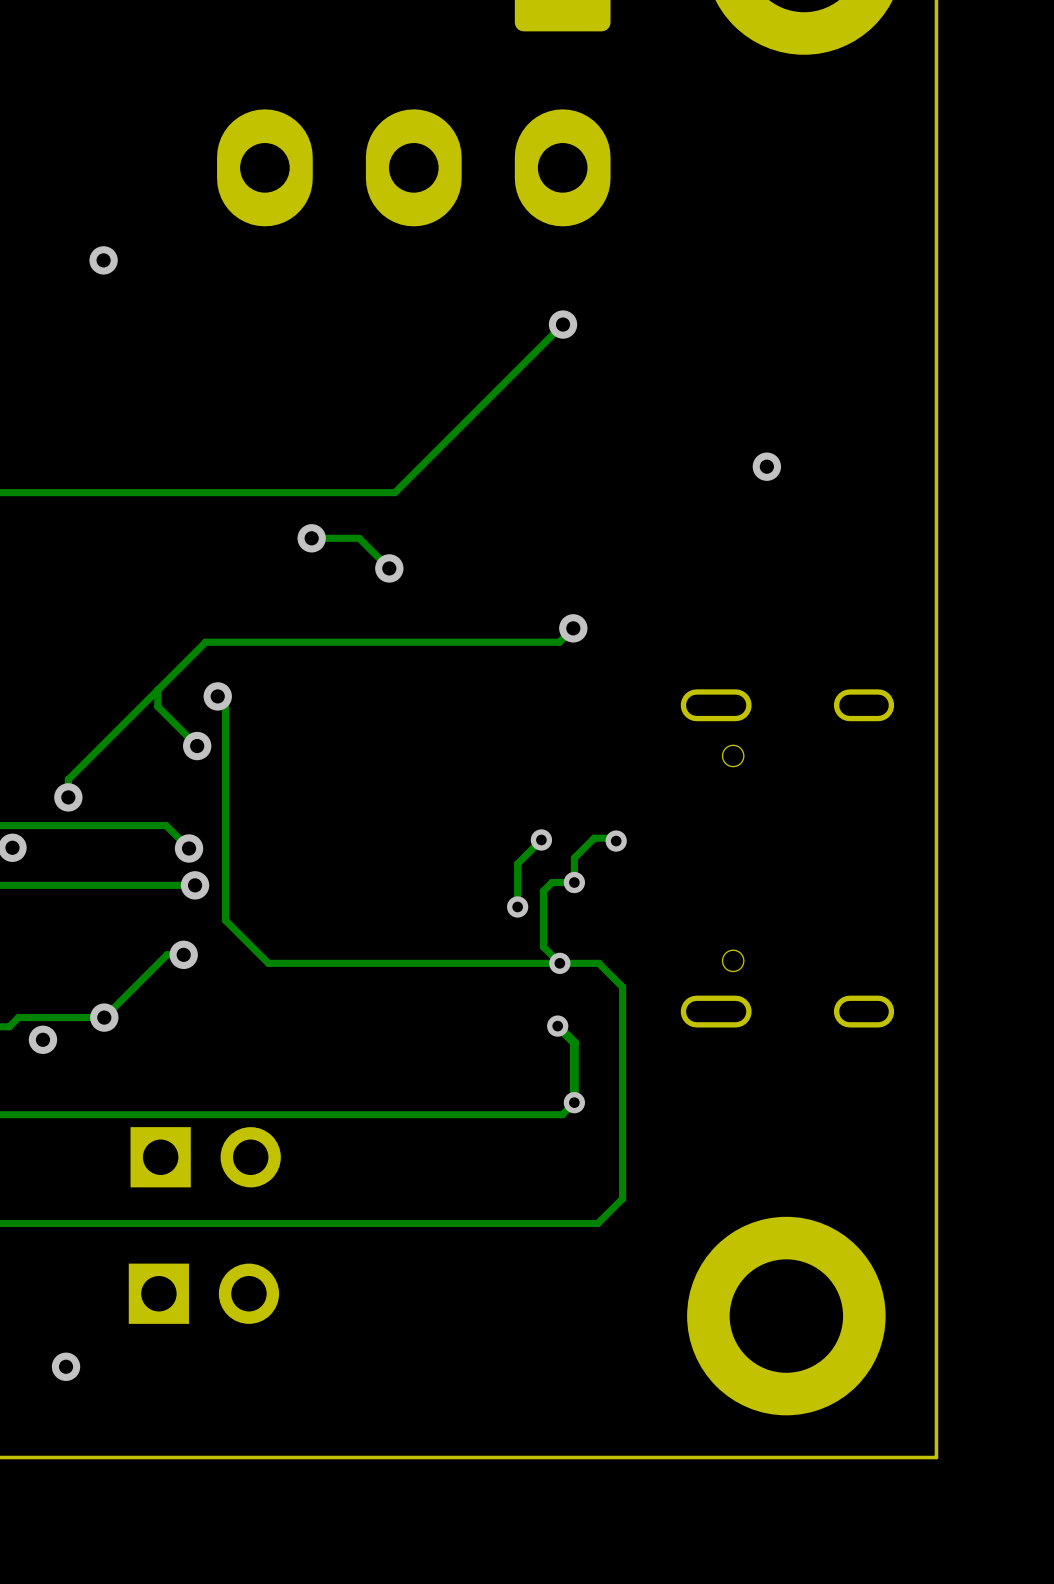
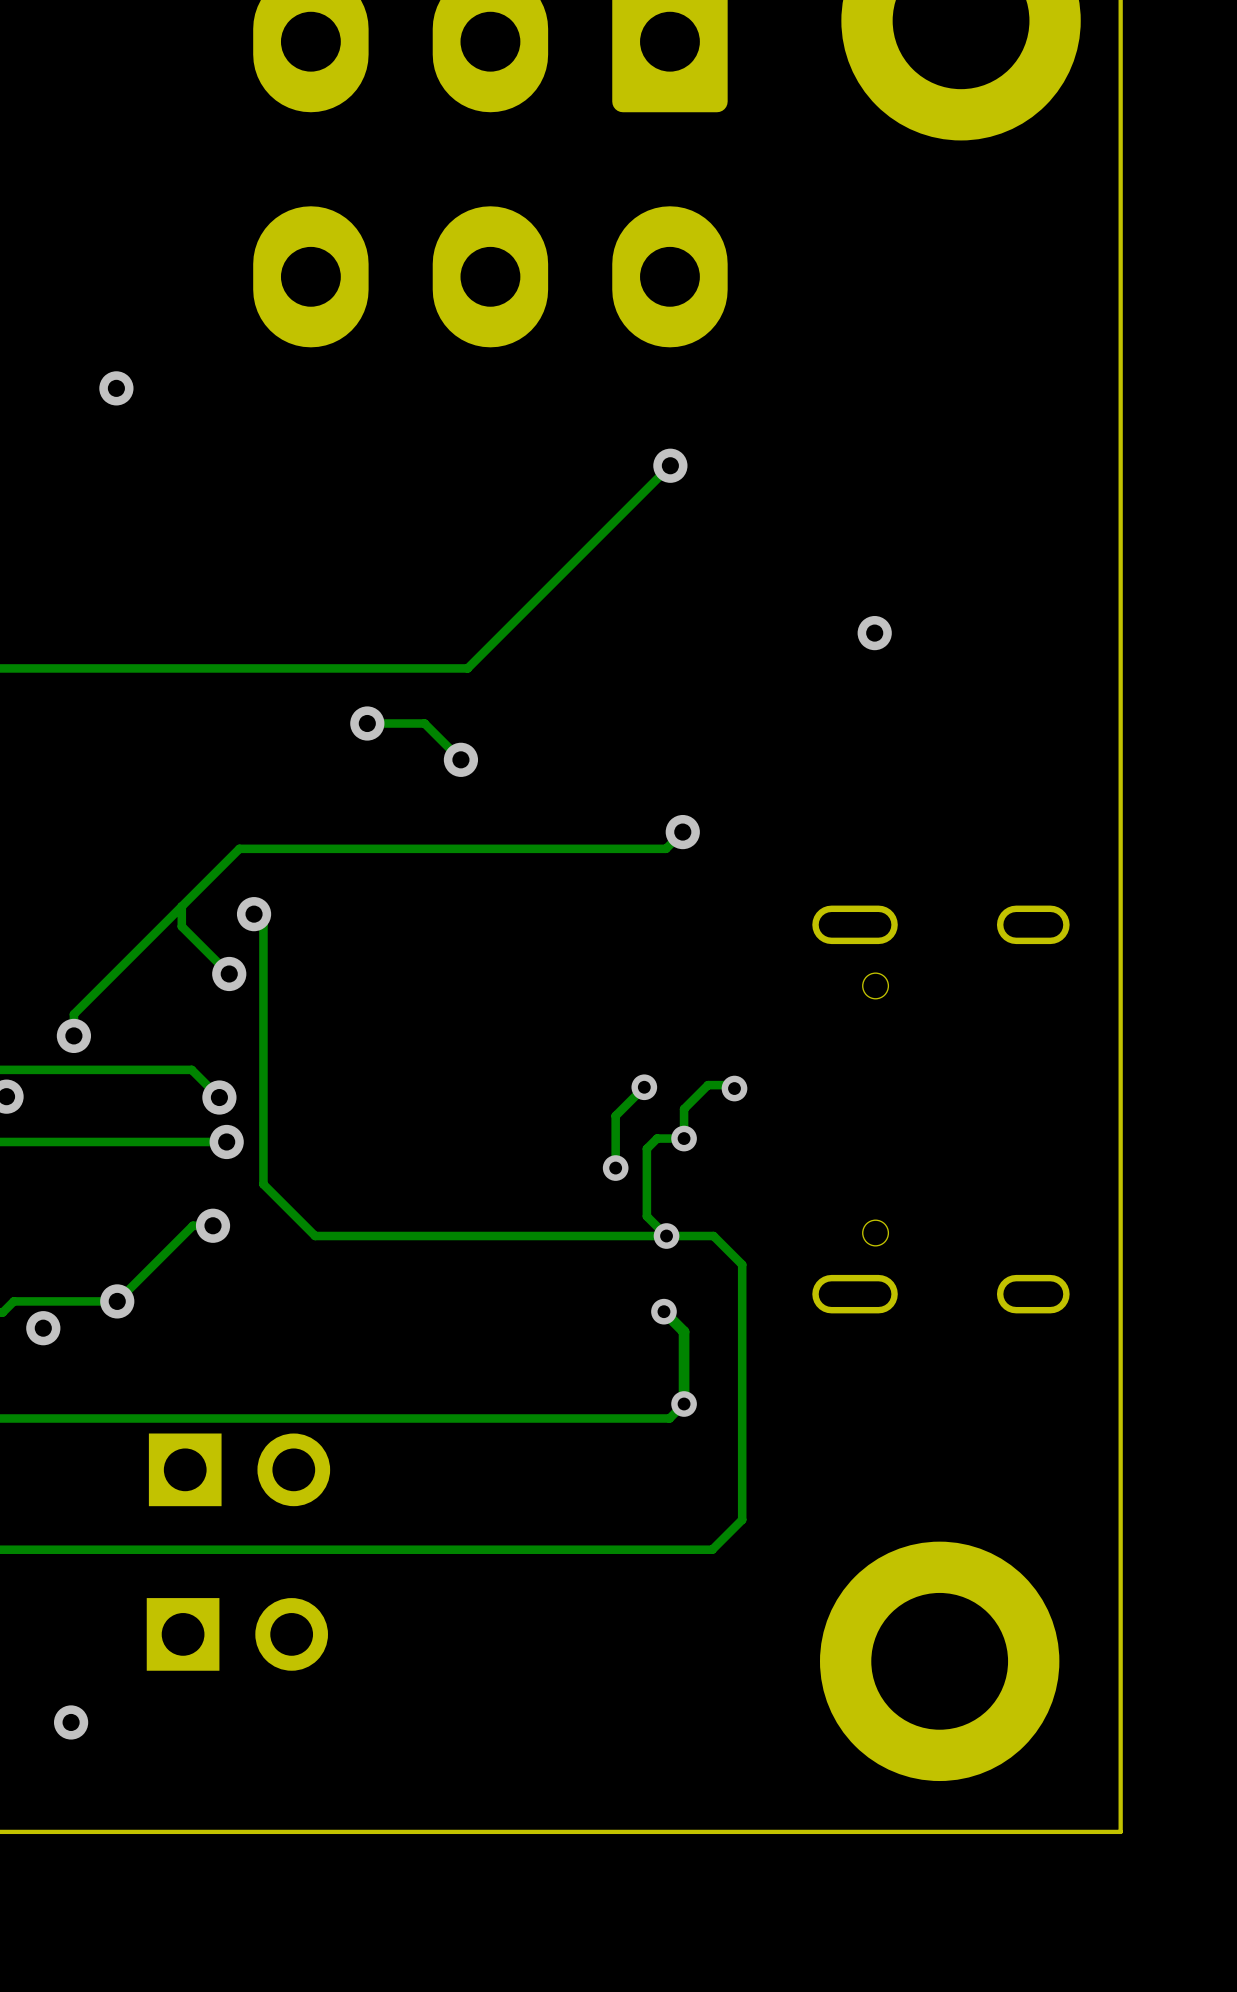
via position: (766, 466) -> (874, 633)

